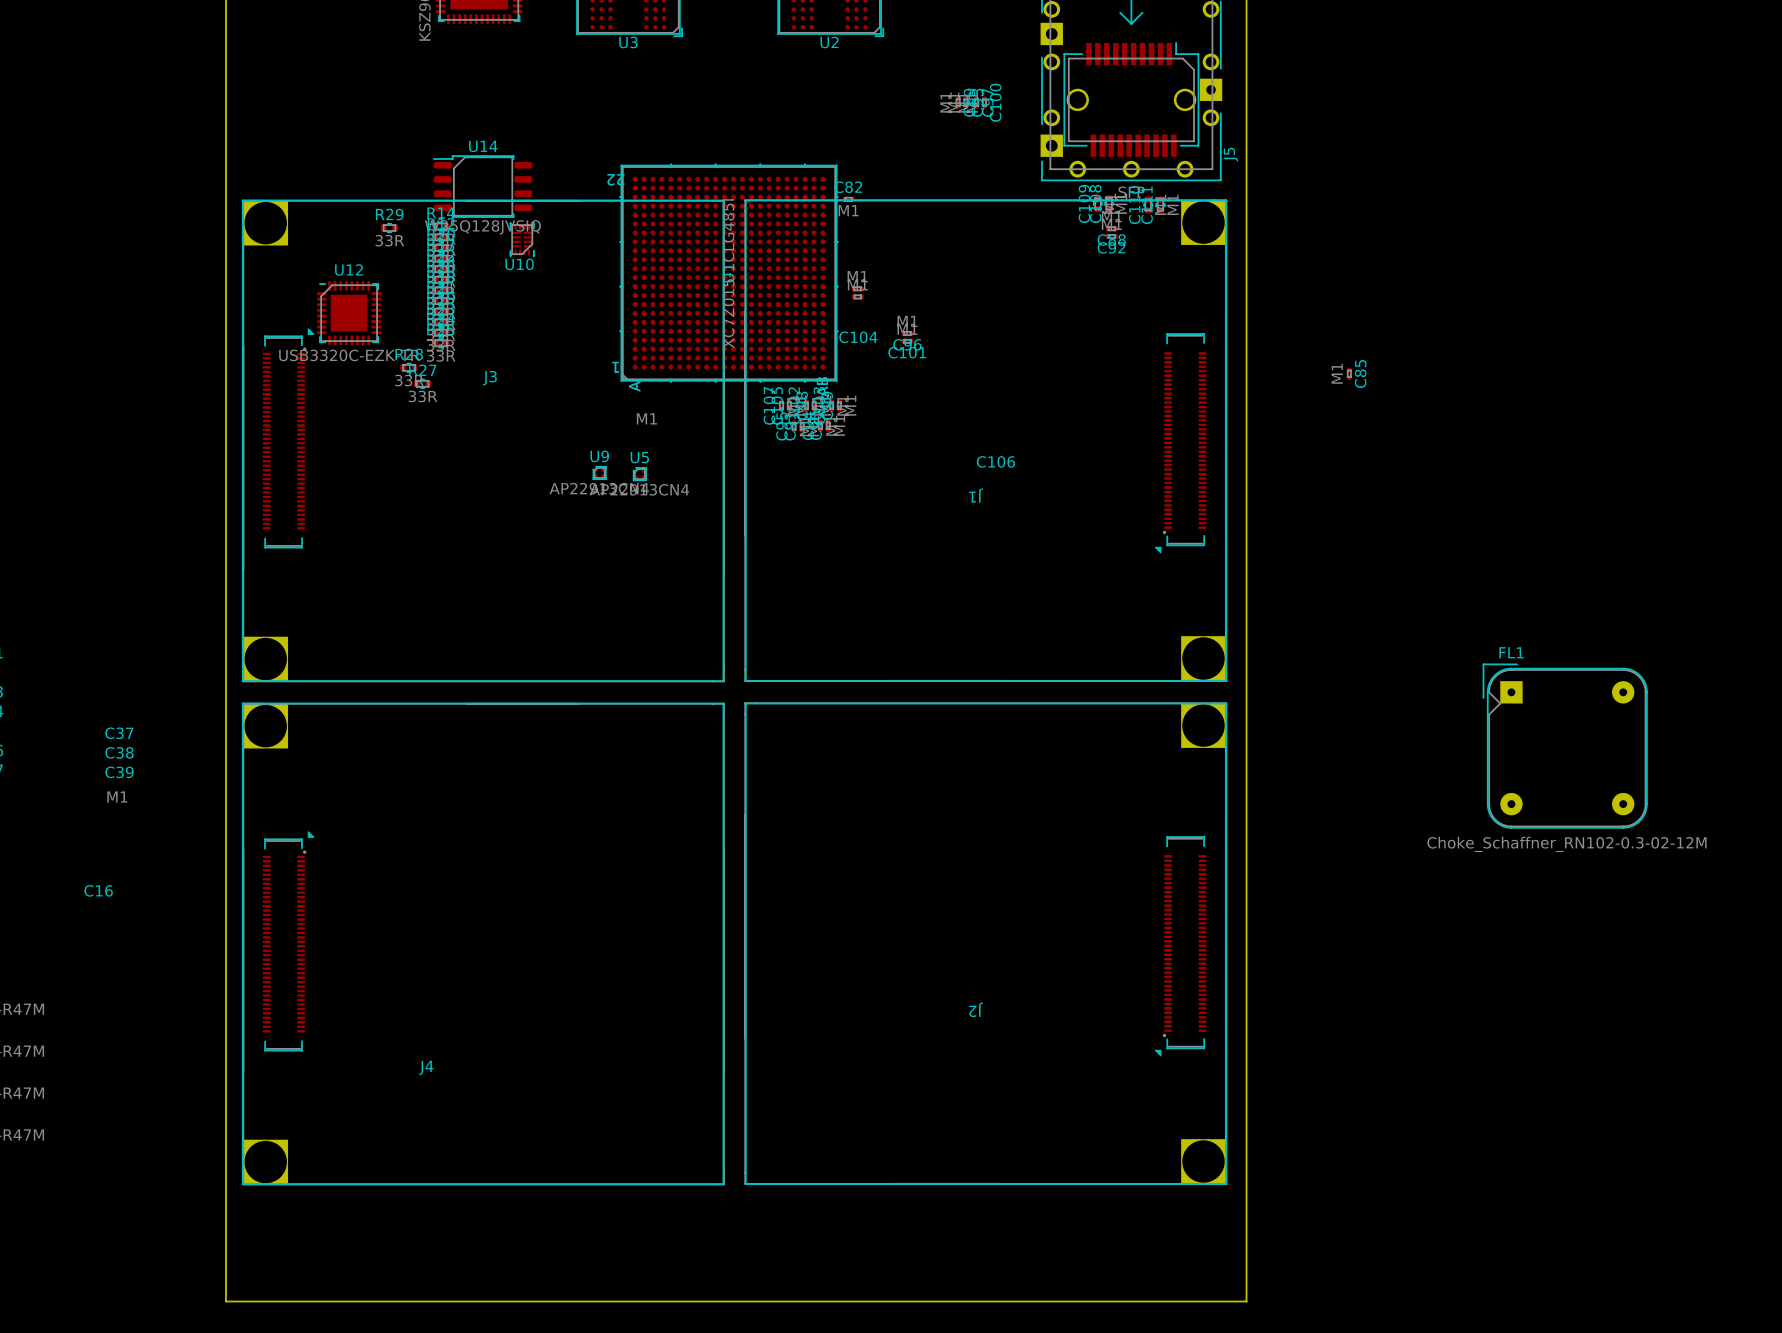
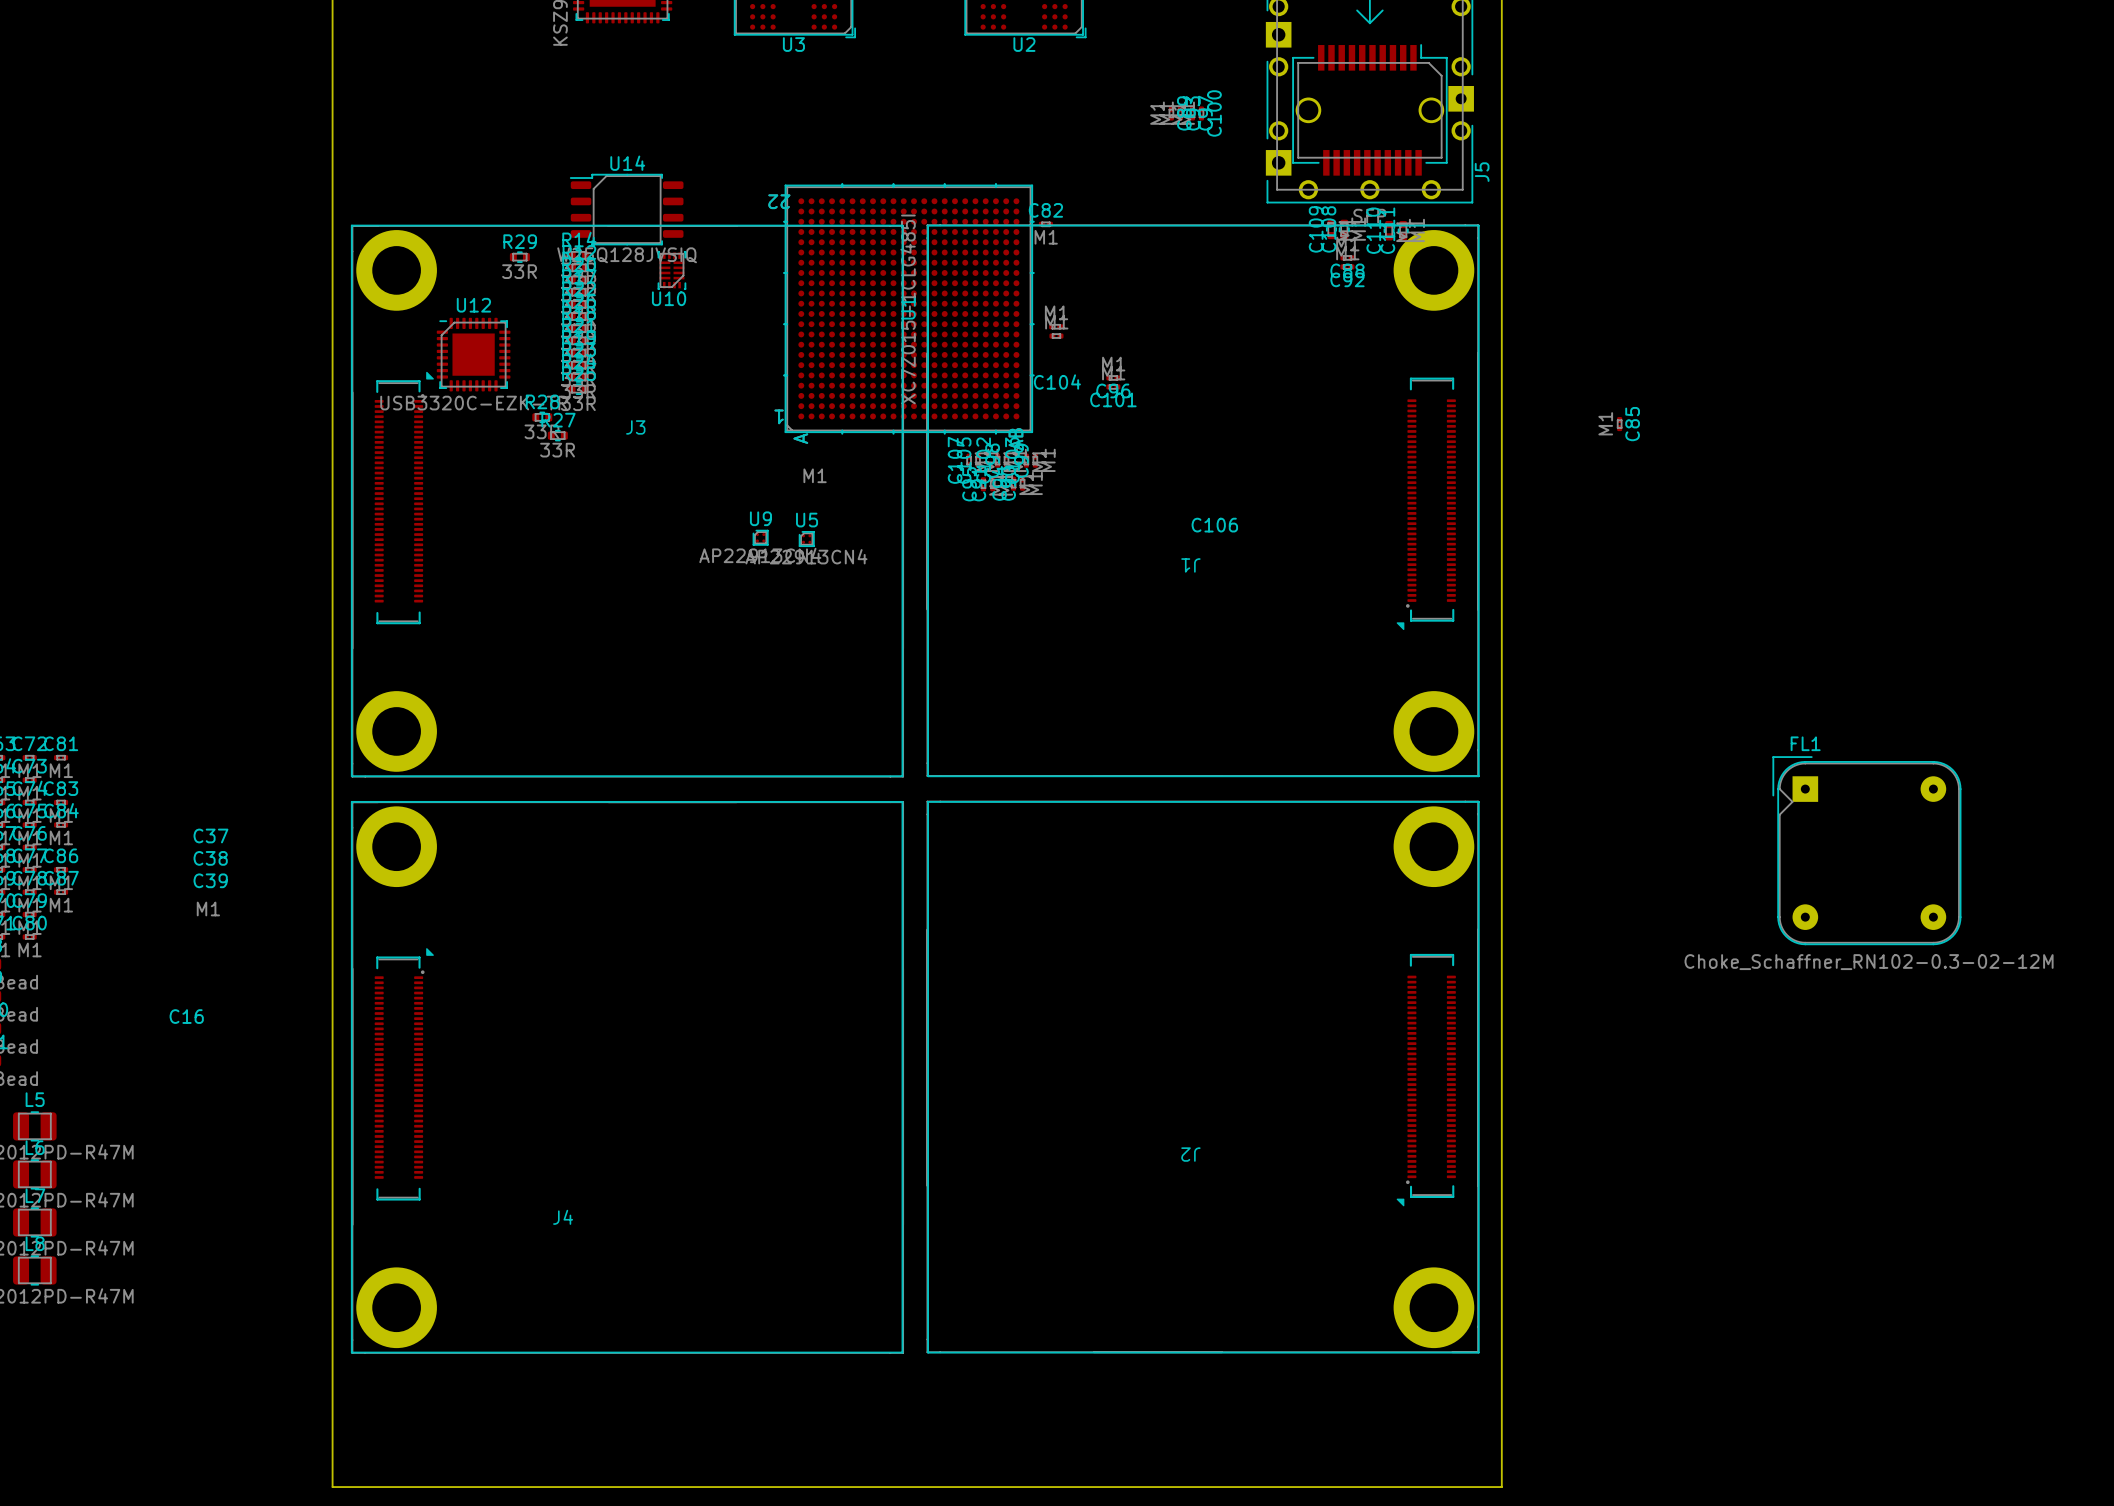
J3 footprint: [242, 199, 725, 682] -> [351, 224, 904, 778]
J1 footprint: [744, 199, 1227, 682] -> [926, 224, 1480, 777]
J4 footprint: [242, 702, 725, 1185] -> [351, 801, 904, 1354]
J2 footprint: [744, 702, 1227, 1185] -> [926, 800, 1480, 1354]

